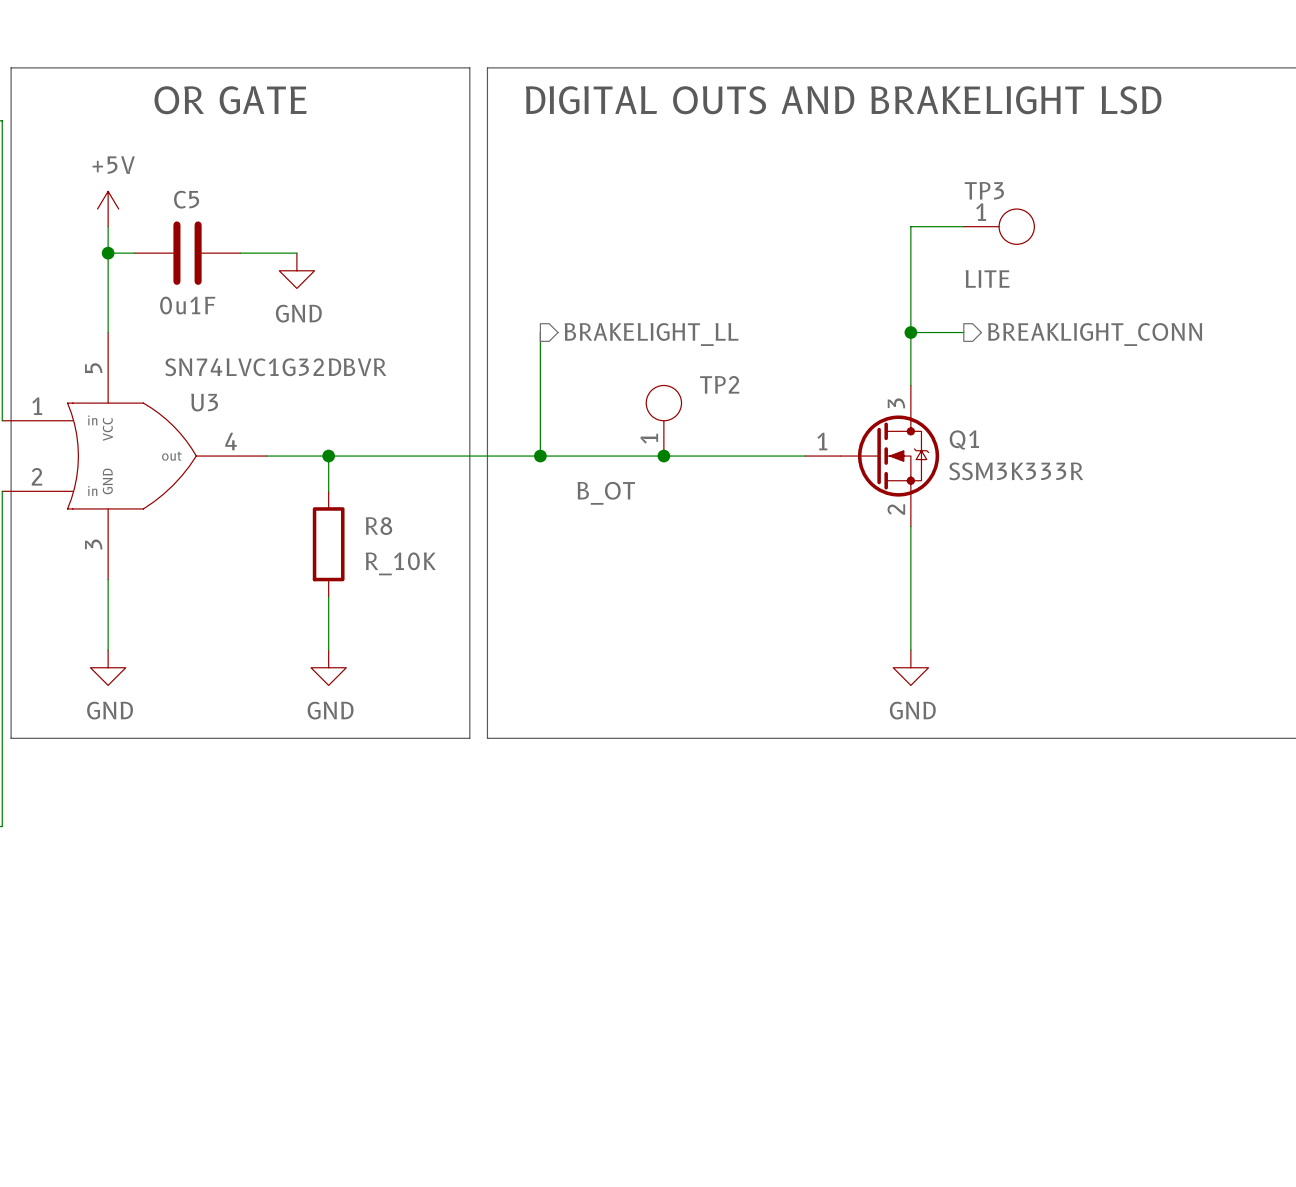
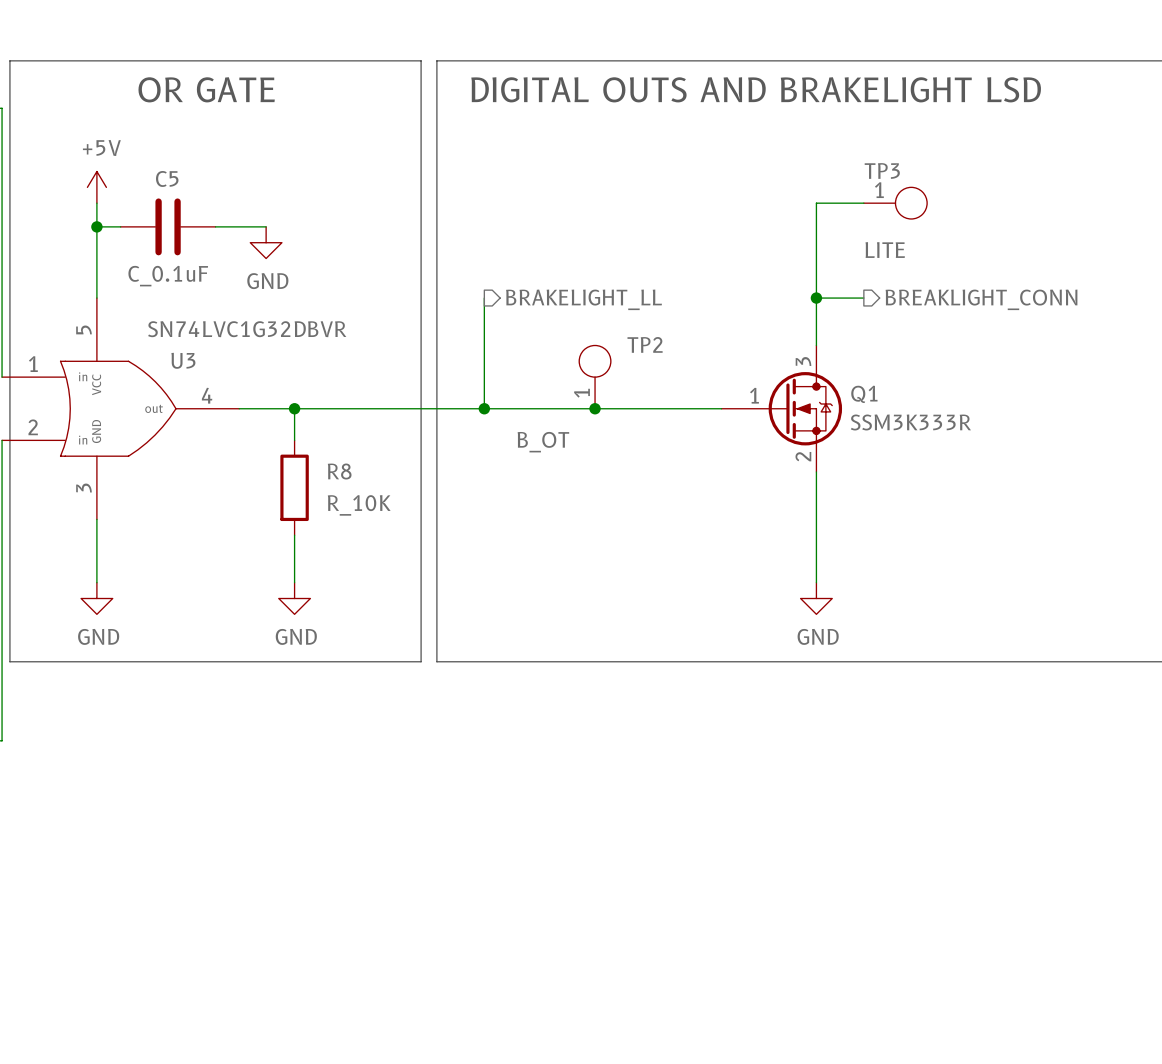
C5 value: 0u1F (187, 305) -> C_0.1uF (168, 276)
Q1 symbol: [805, 385, 940, 527] -> [721, 345, 843, 473]

